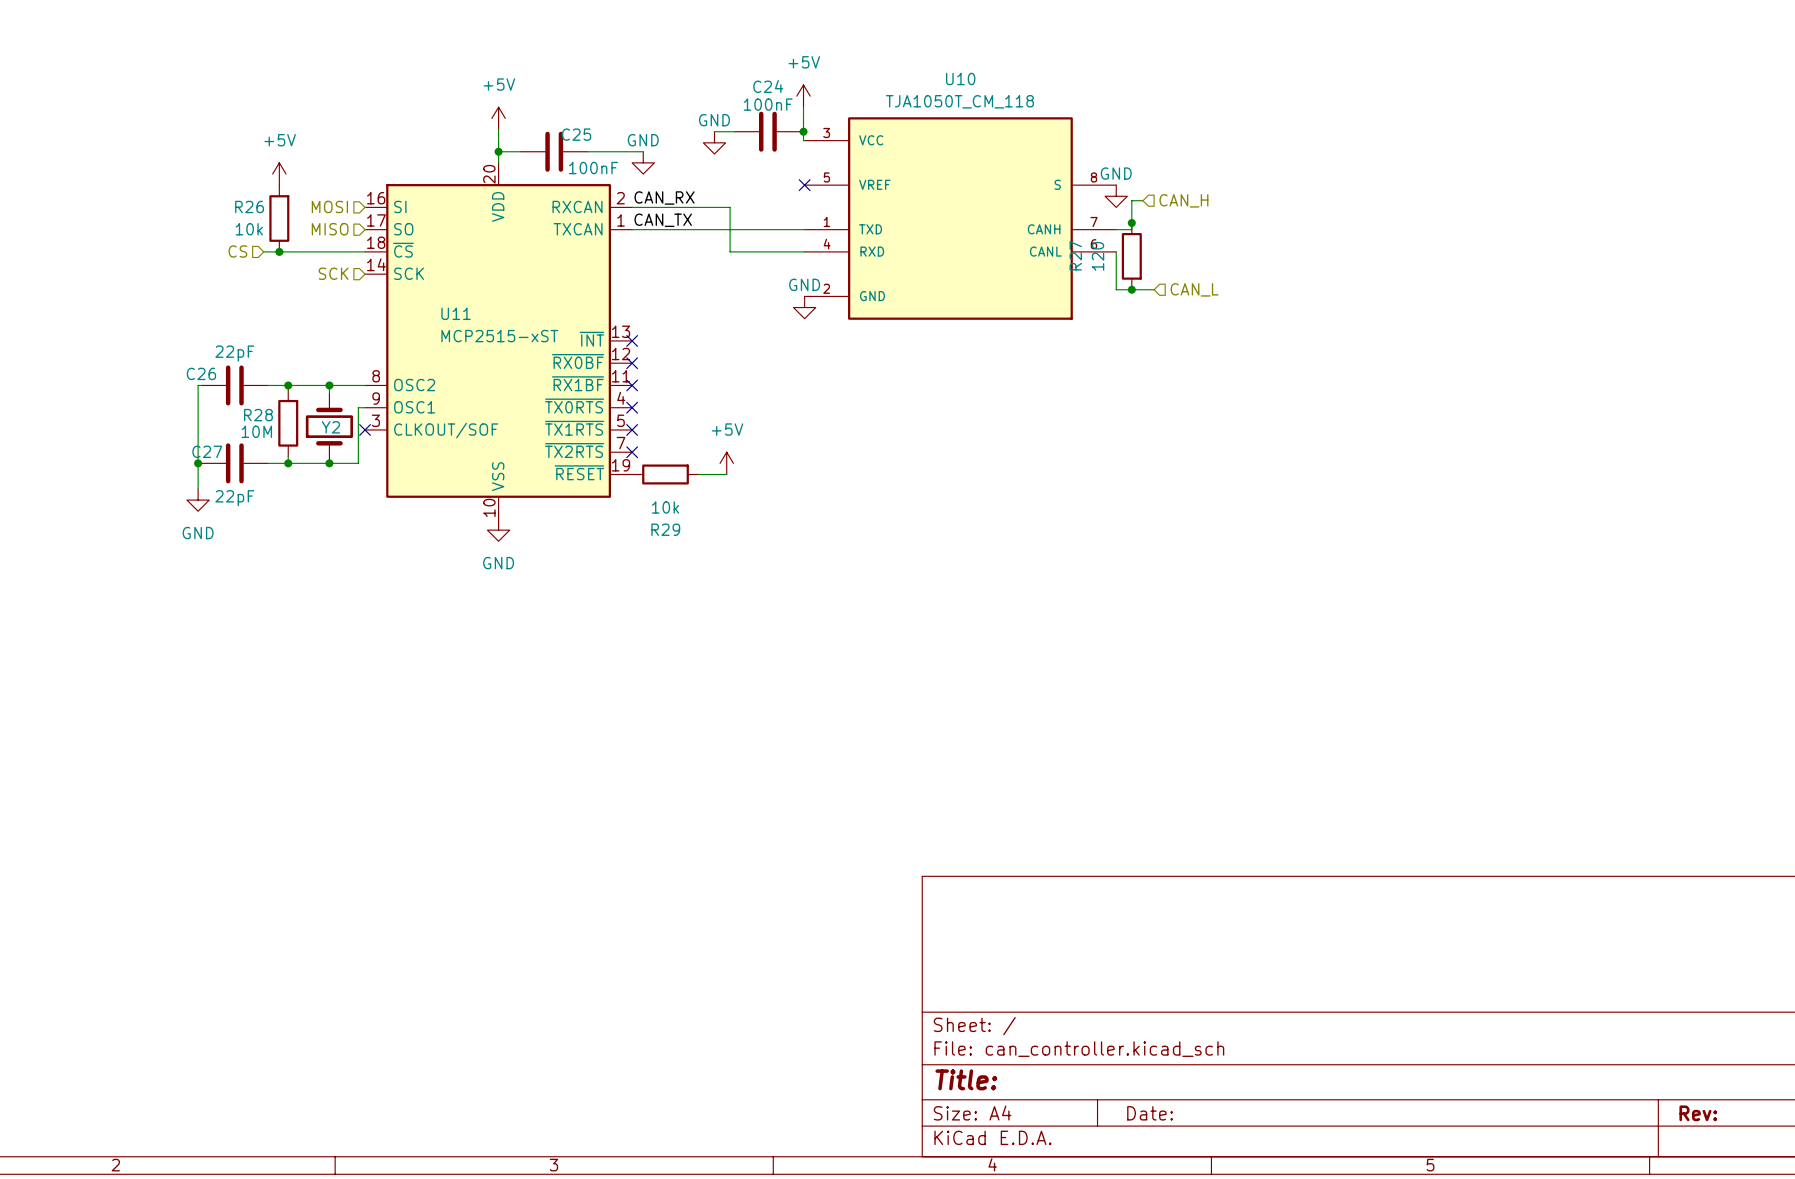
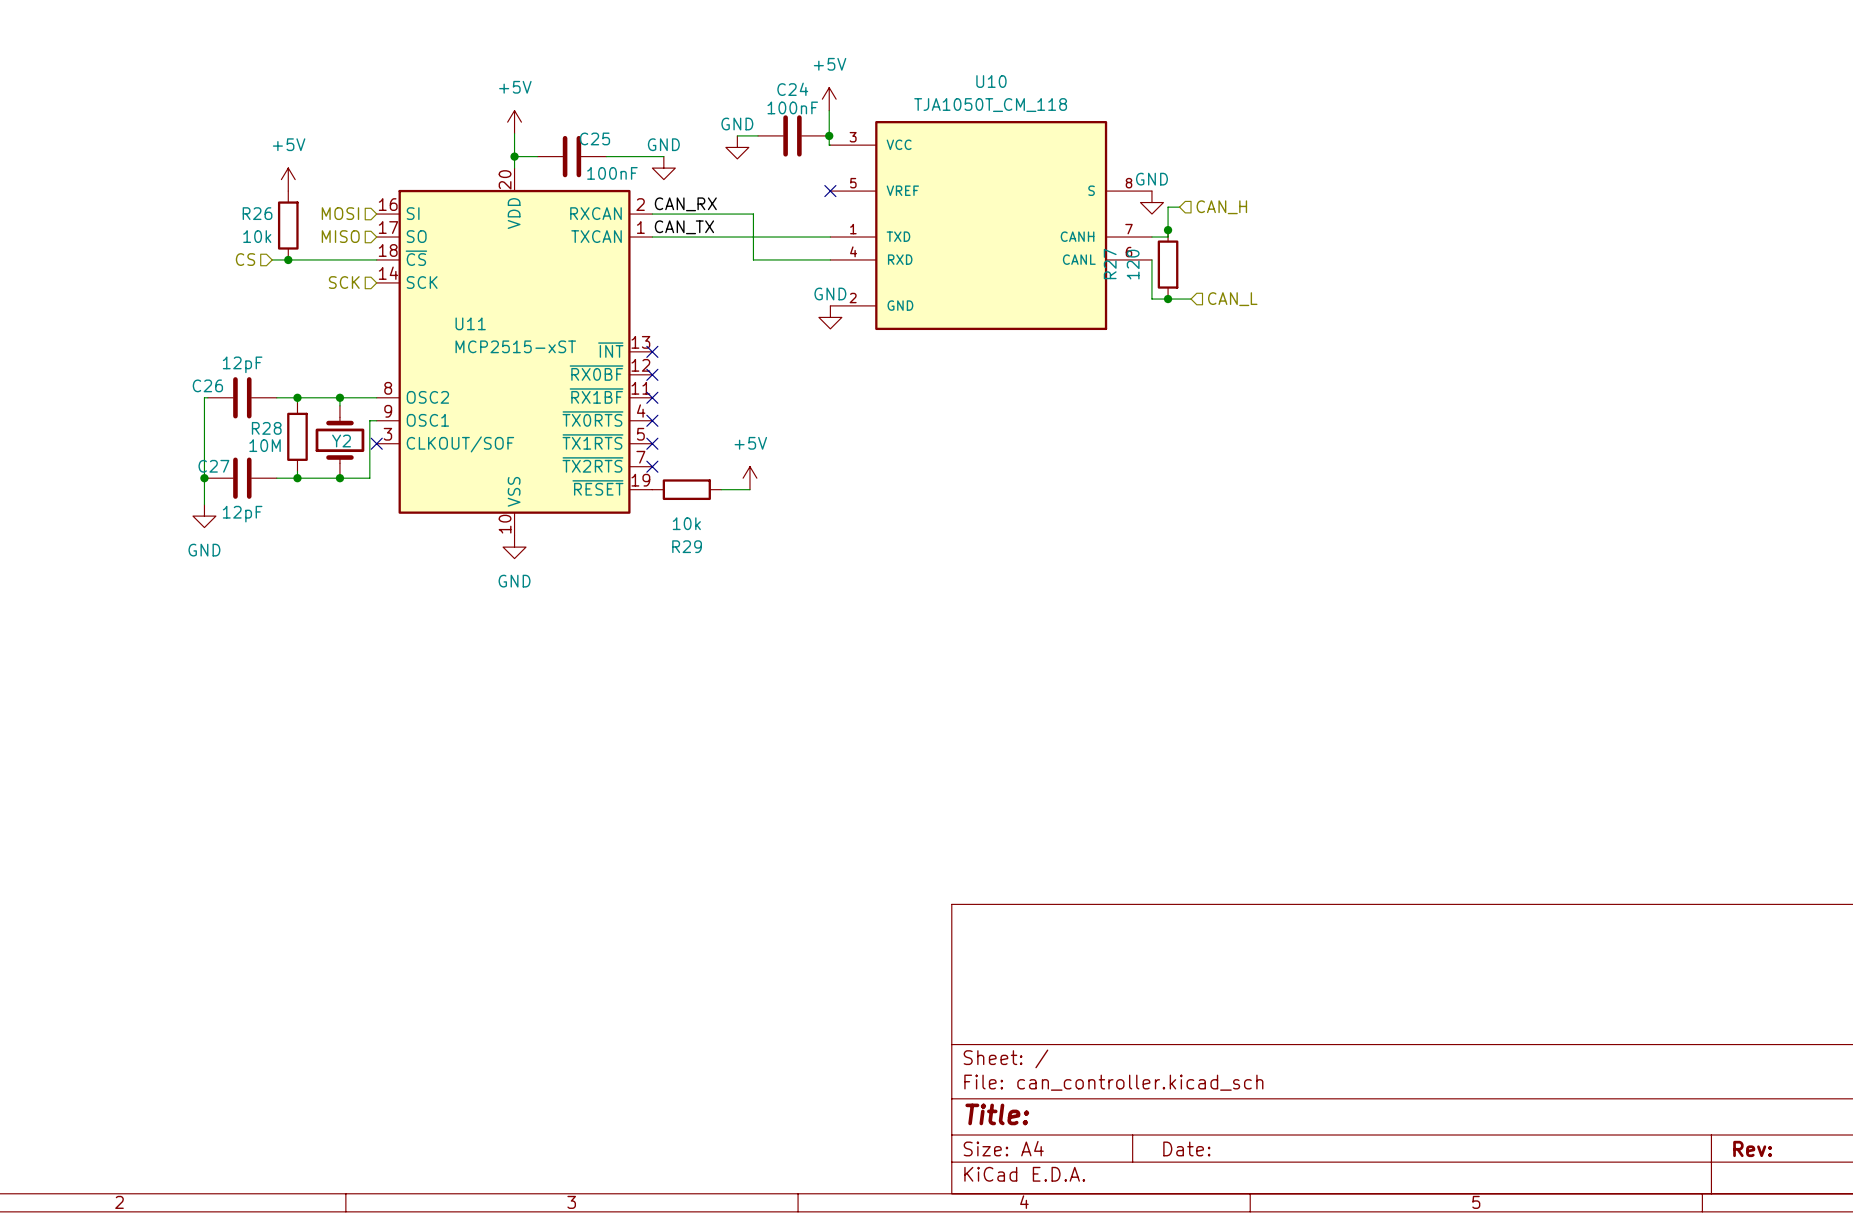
C26 value: 22pF (234, 353) -> 12pF (242, 364)
C27 value: 22pF (234, 498) -> 12pF (242, 514)

